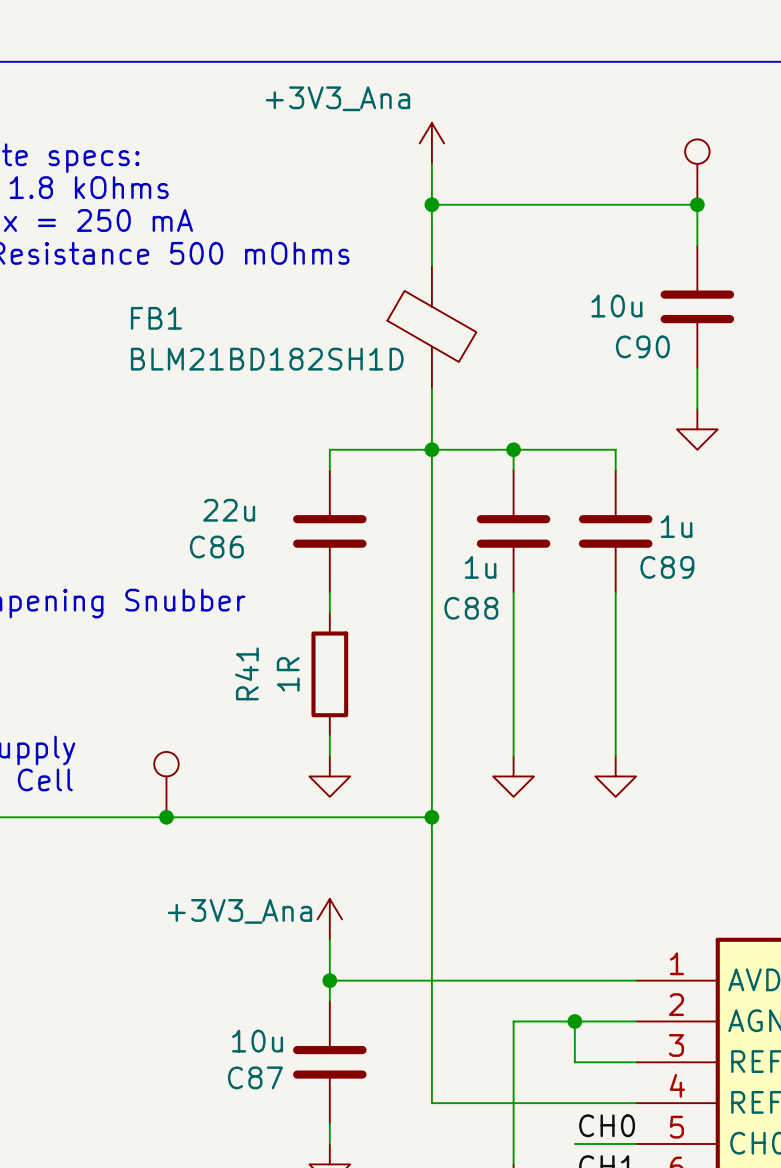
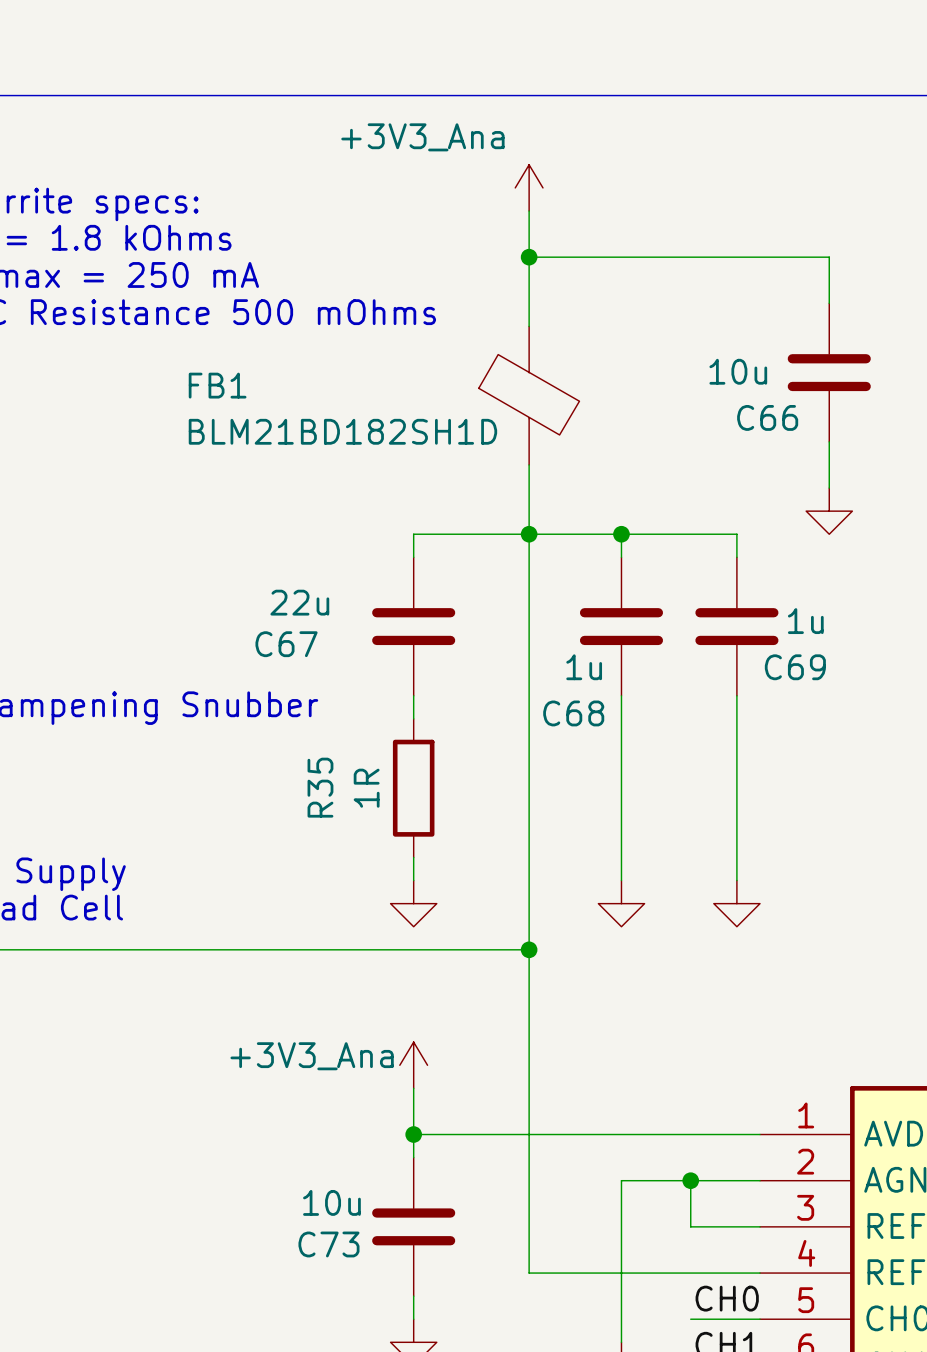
part: (697, 172) -> none
junction: (697, 204) -> none
C90 name: C90 (642, 346) -> C66 (767, 417)
C86 name: C86 (216, 547) -> C67 (286, 644)
C89 name: C89 (667, 567) -> C69 (795, 667)
C88 name: C88 (471, 608) -> C68 (573, 713)
R41 name: R41 (246, 673) -> R35 (320, 787)
part: (166, 784) -> none
junction: (166, 817) -> none
C87 name: C87 (255, 1077) -> C73 (328, 1244)

